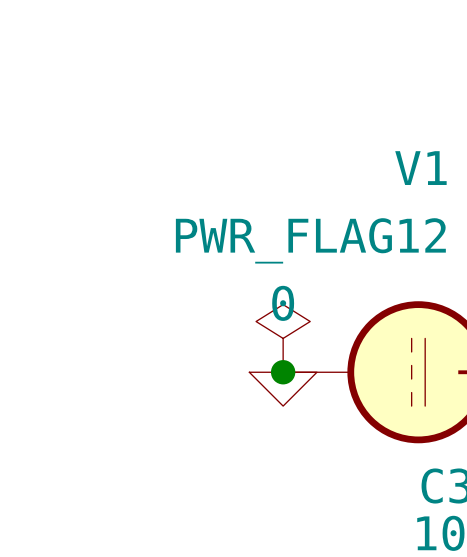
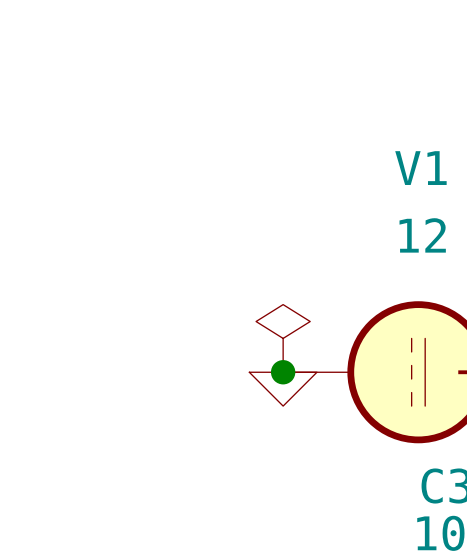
power symbol text: PWR_FLAG (283, 240) -> none
power symbol text: 0 (283, 303) -> none

